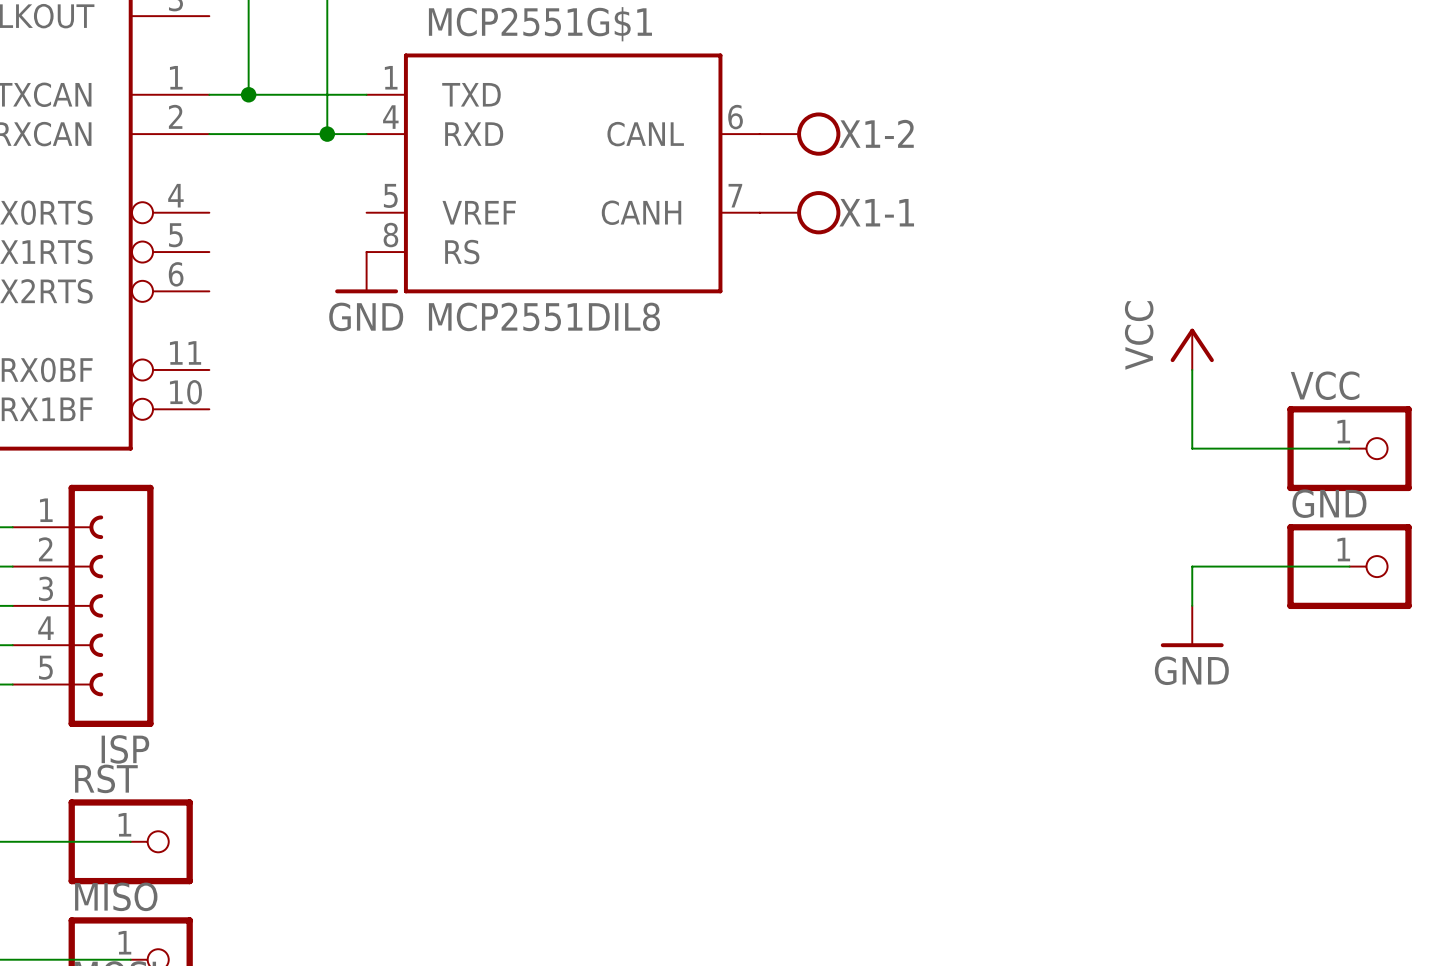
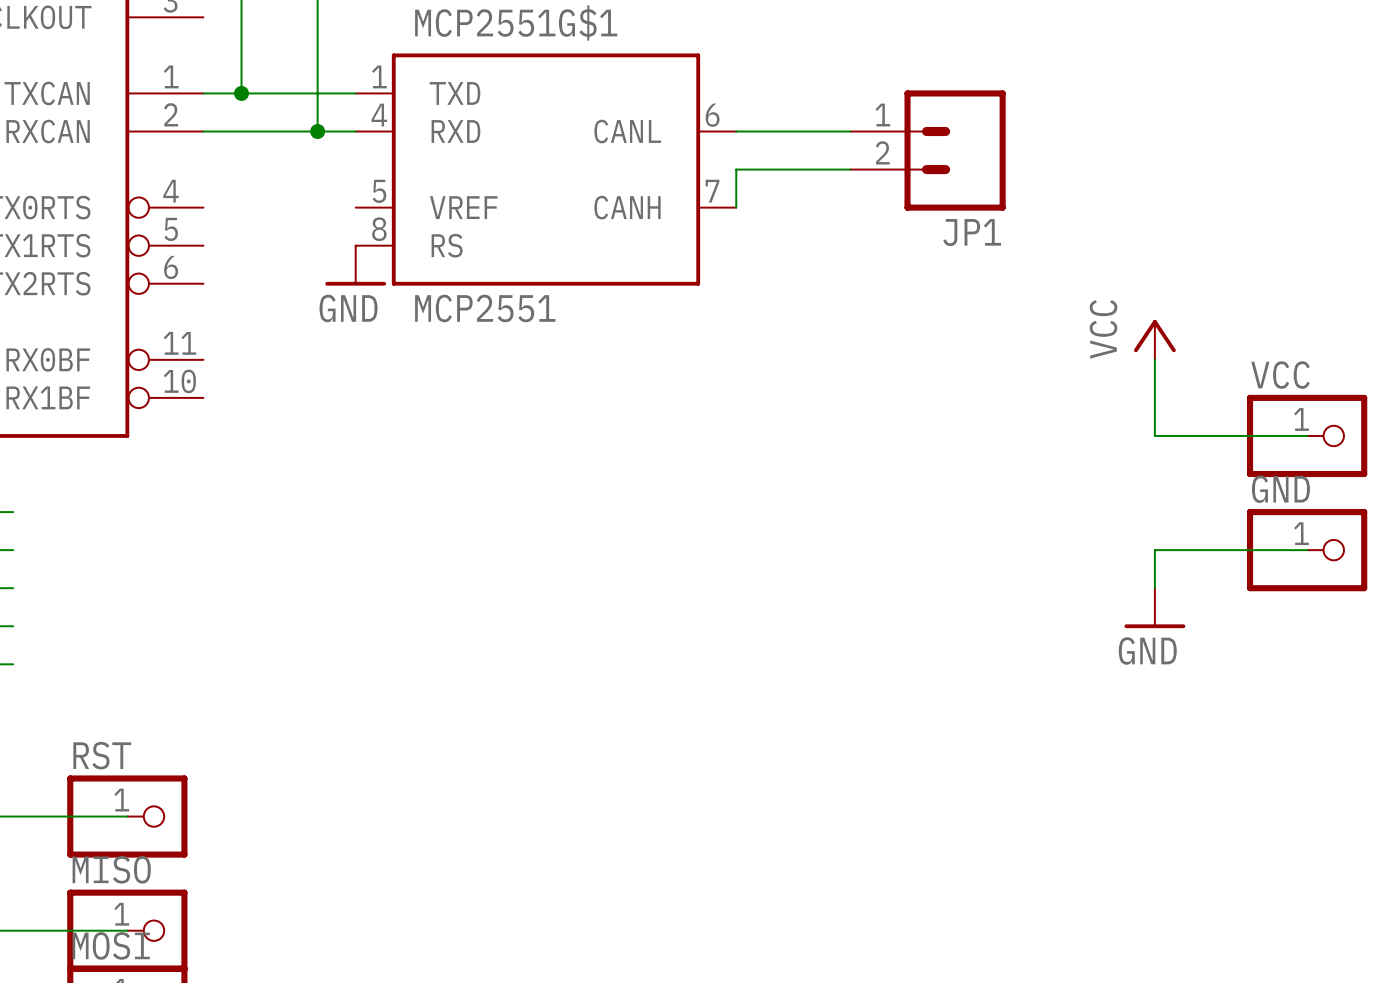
wire: none -> (736, 131) (850, 131)
X1-2: (800, 134) -> none
JP1: none -> (928, 150)
wire: none -> (850, 169) (736, 169) (736, 207)
X1-1: (800, 212) -> none
MCP2551G$1 value: MCP2551DIL8 (544, 316) -> MCP2551 (485, 308)
ISP: (83, 605) -> none

